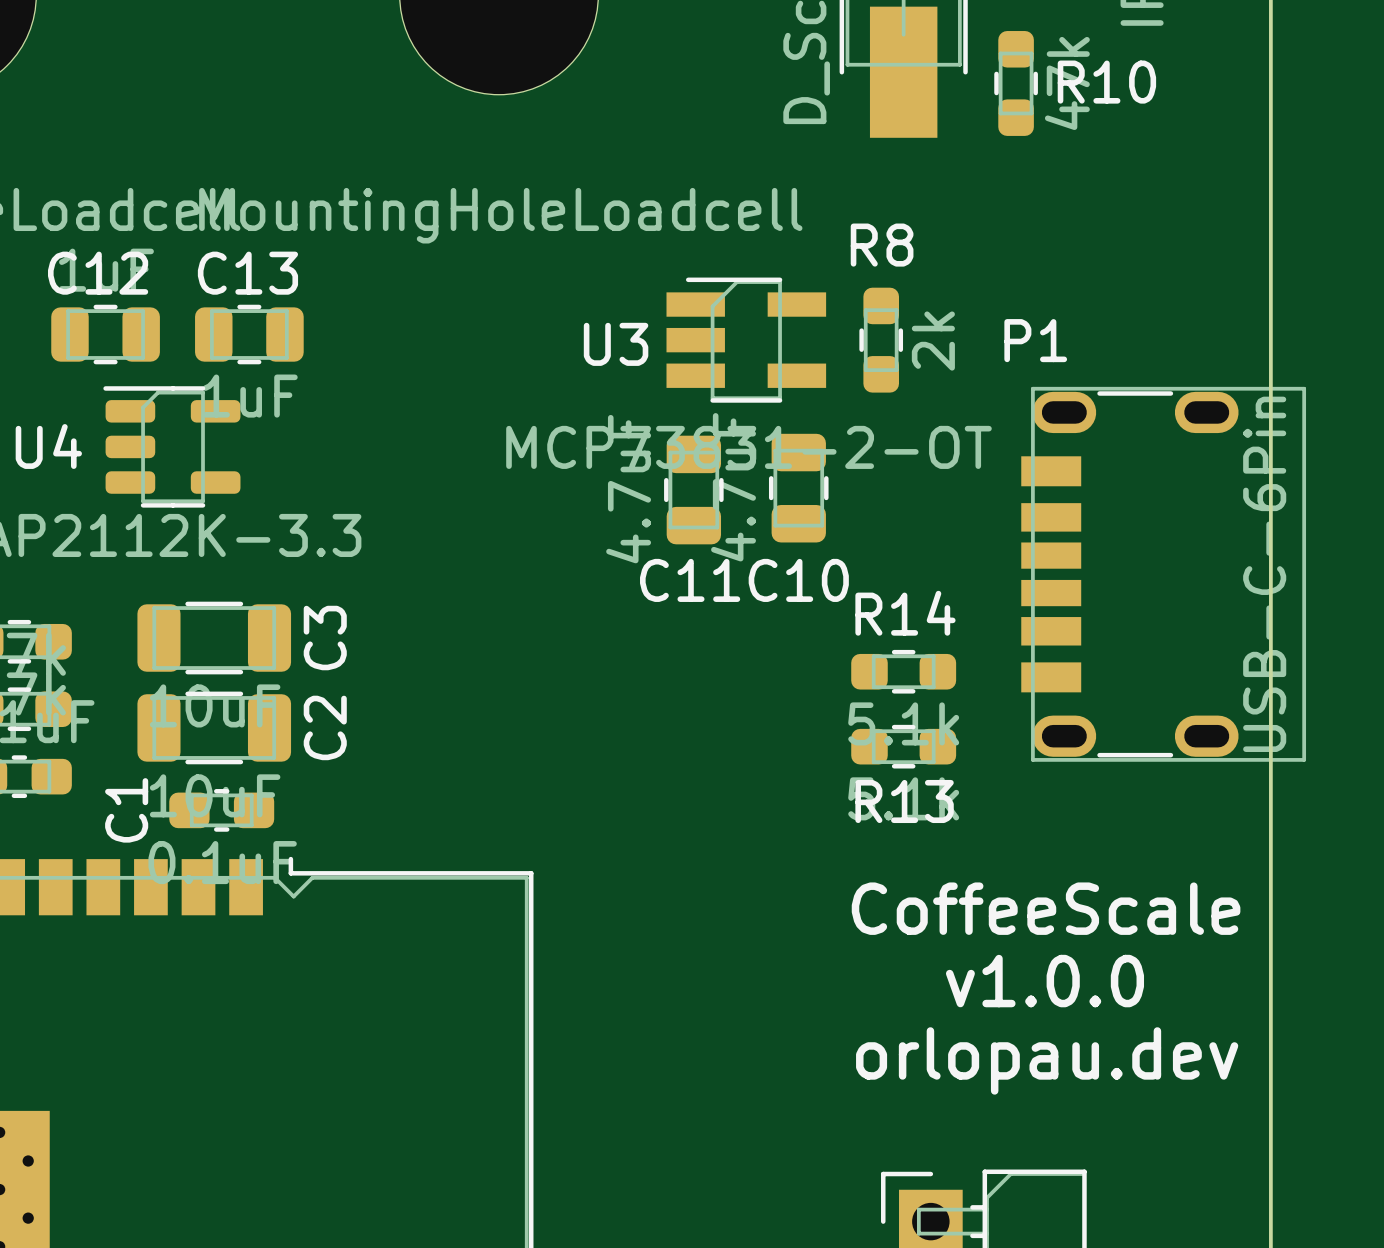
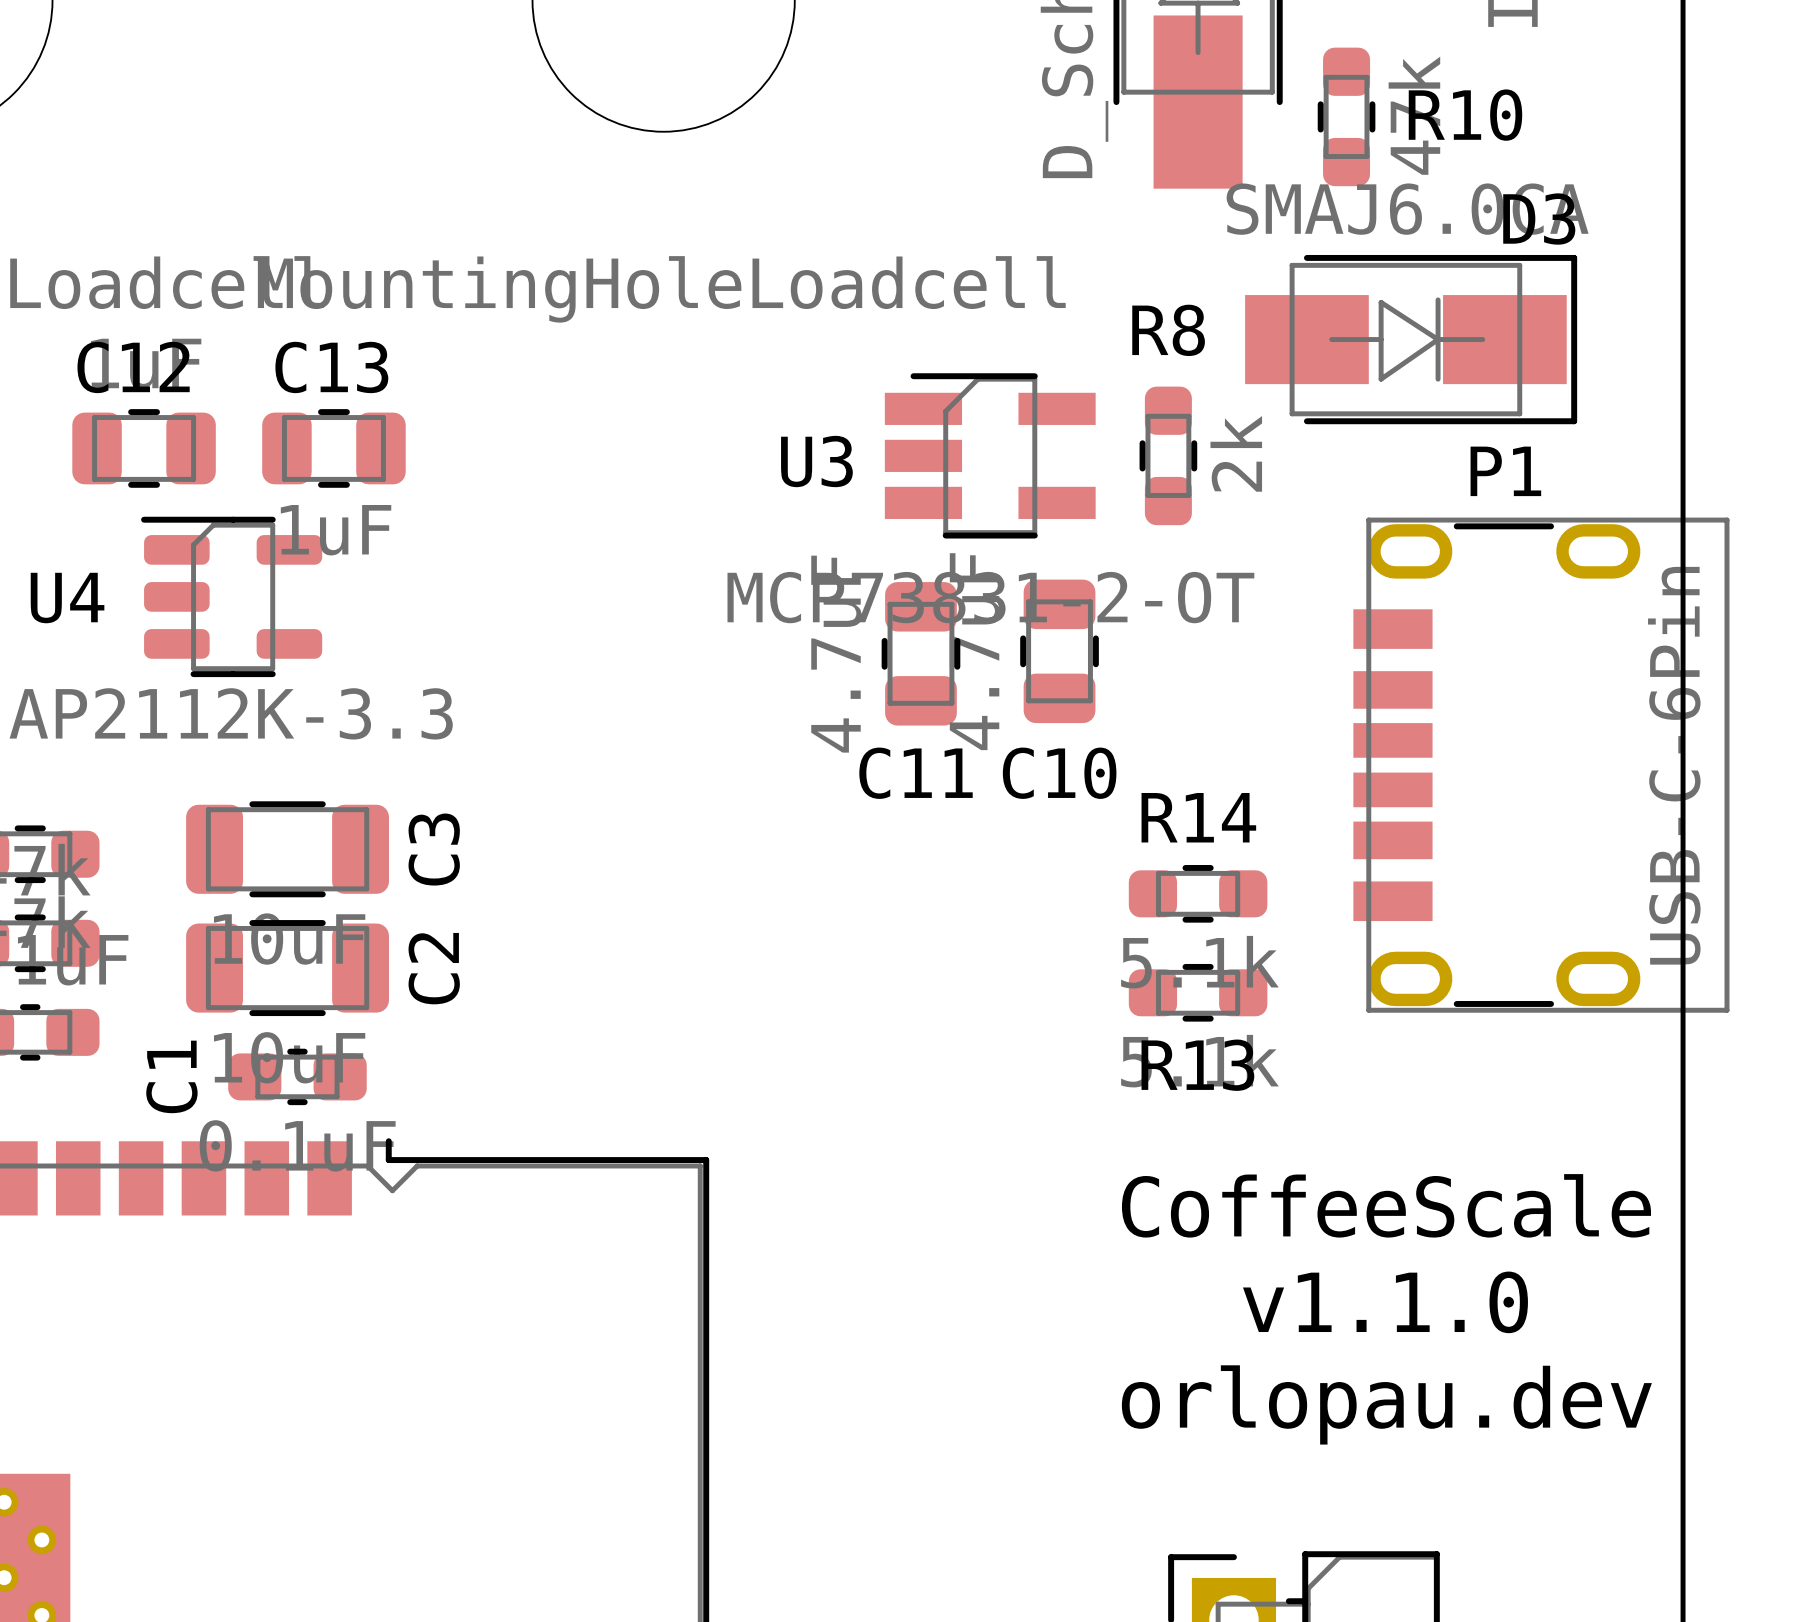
D3: none -> SMAJ6.0CA (1411, 339)
P1 name position: P1 (1035, 340) -> P1 (1505, 471)
text: v1.0.0 (1044, 981) -> v1.1.0 (1385, 1302)

